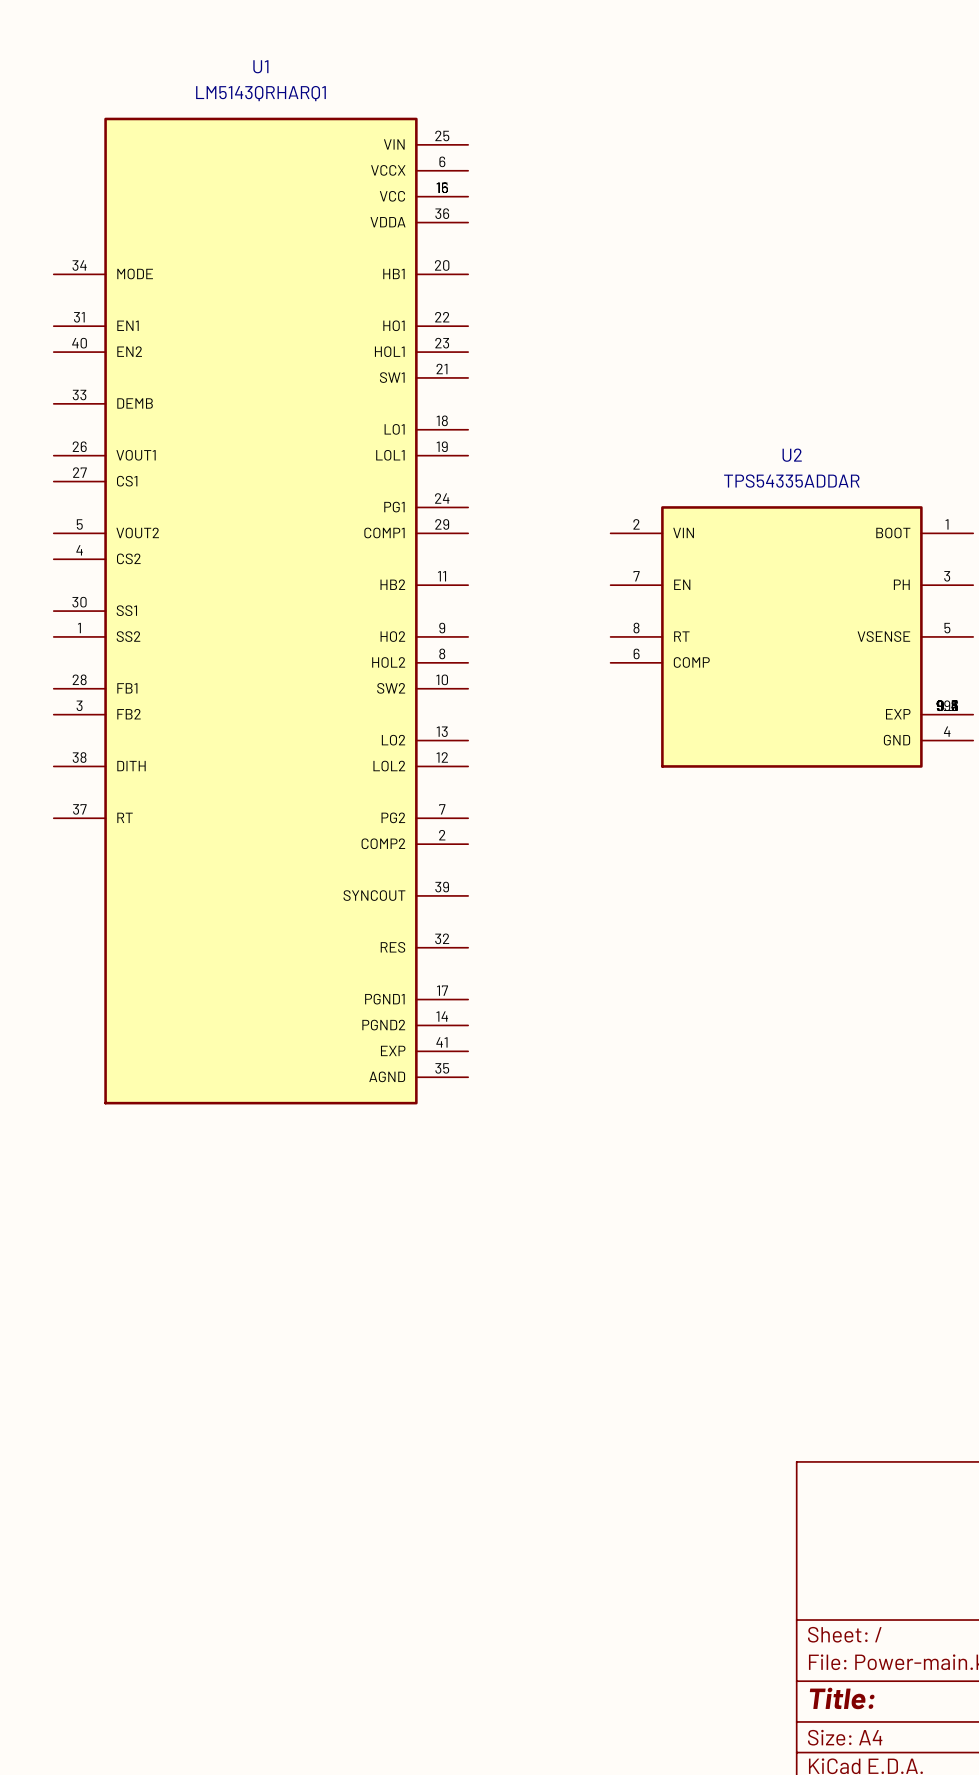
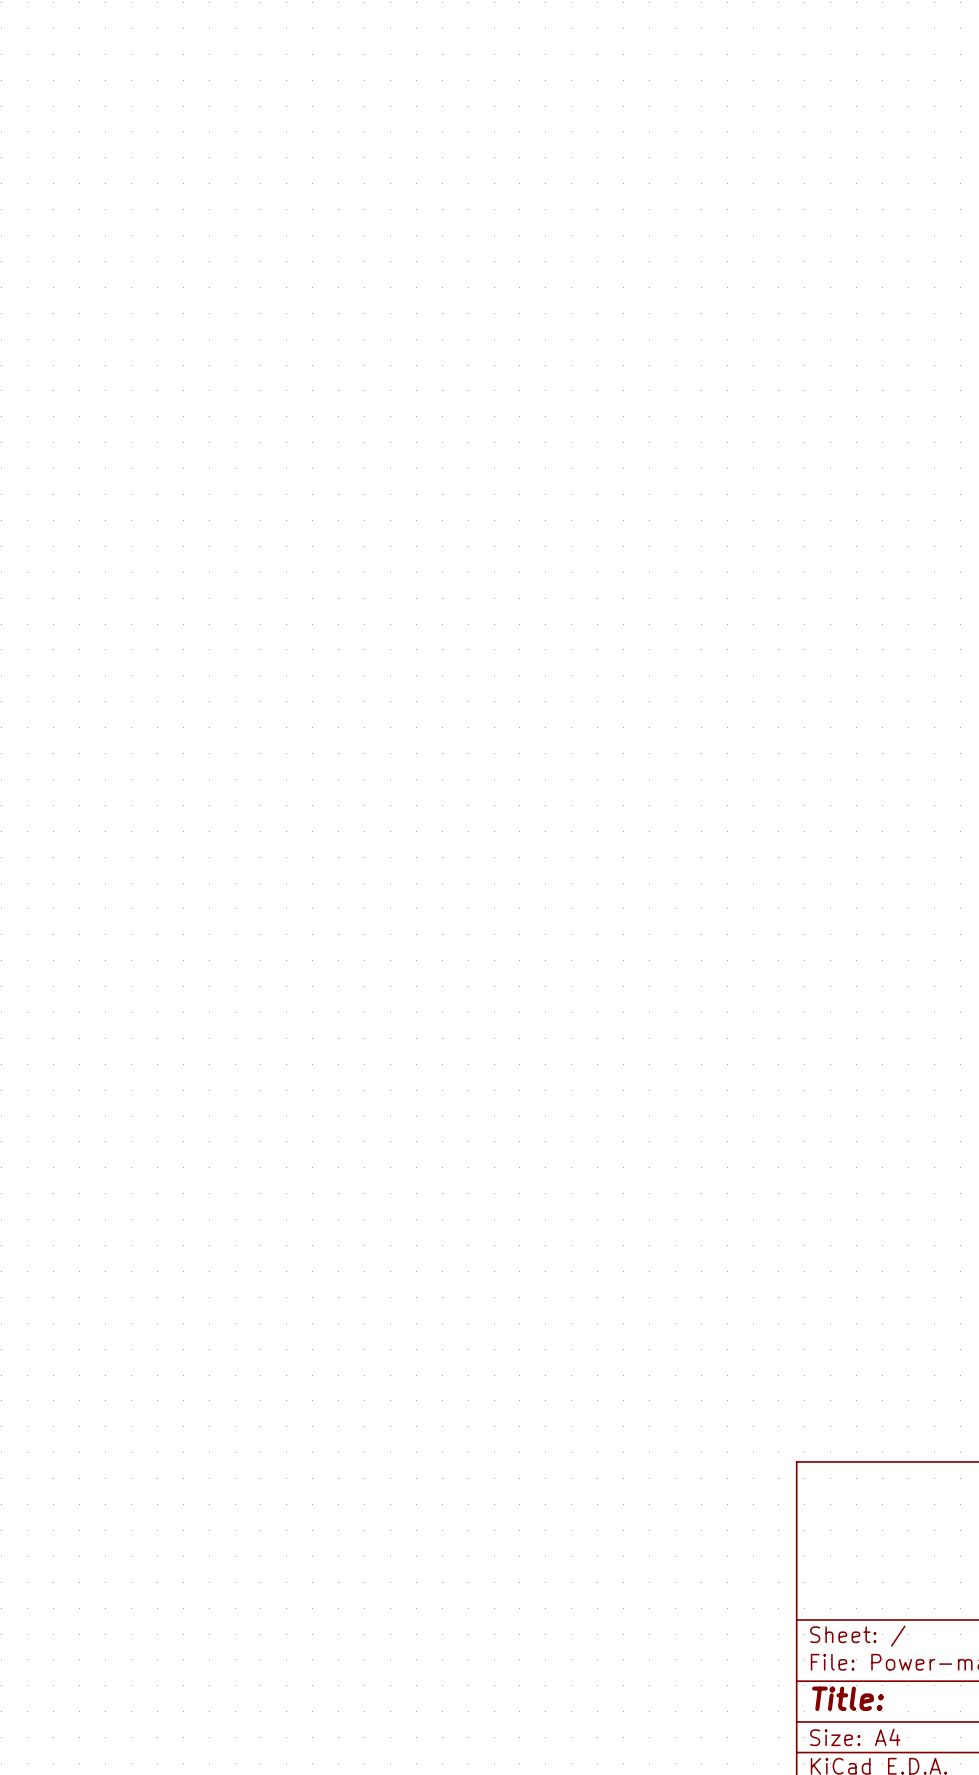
U1: LM5143QRHARQ1 (260, 611) -> none
U2: TPS54335ADDAR (791, 636) -> none

